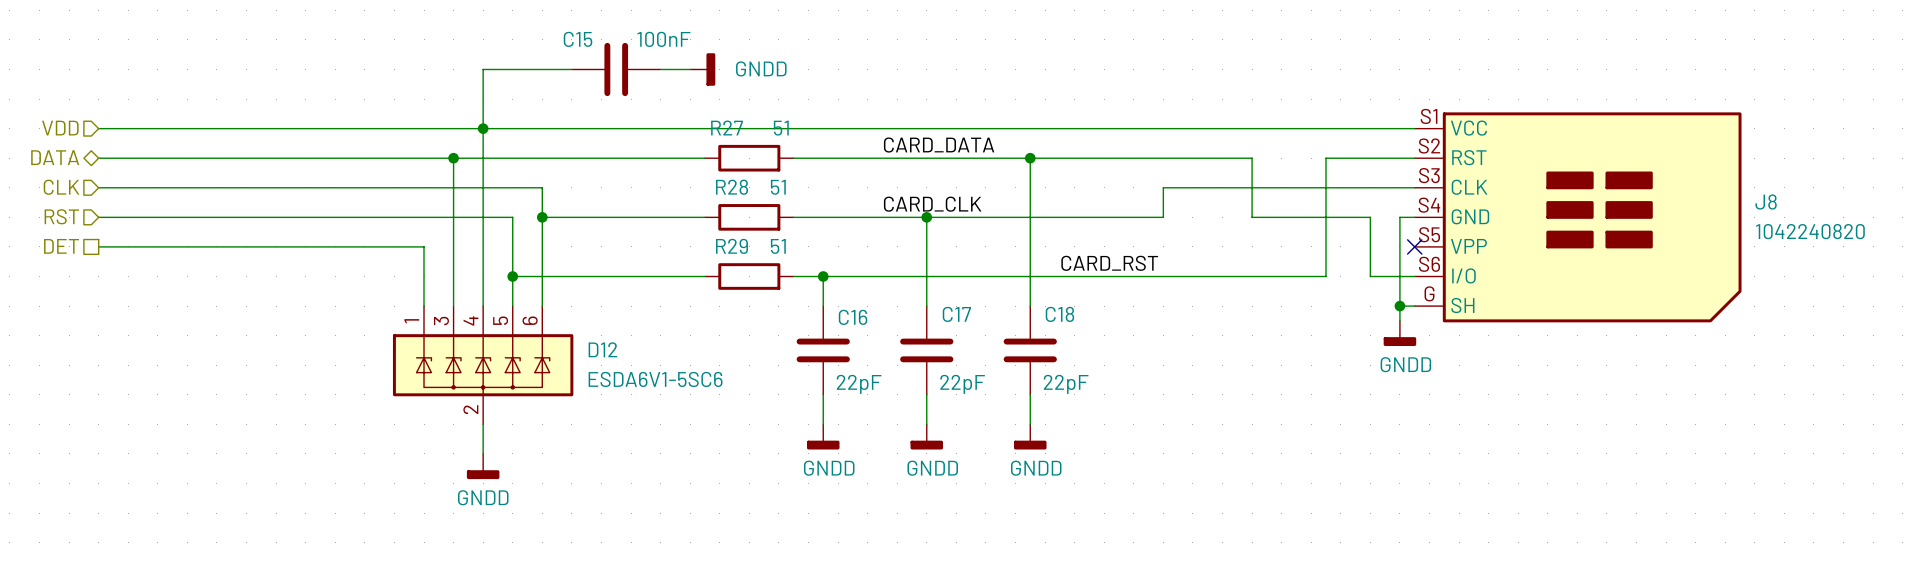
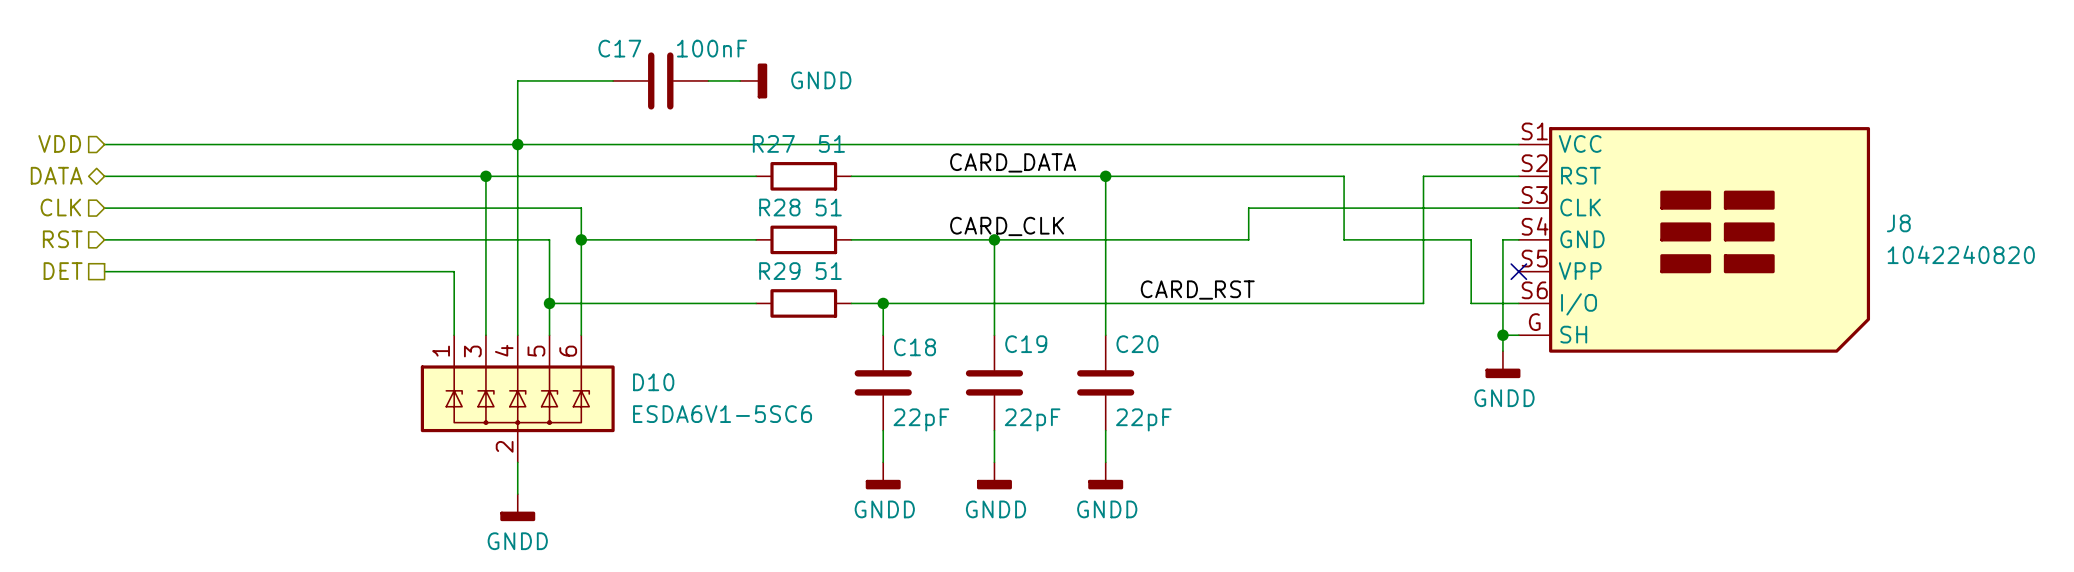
C15 name: C15 (578, 39) -> C17 (619, 48)
C17 name: C17 (956, 314) -> C19 (1026, 344)
C18 name: C18 (1059, 314) -> C20 (1137, 344)
C16 name: C16 (853, 317) -> C18 (915, 347)
D12 name: D12 (602, 349) -> D10 (653, 382)

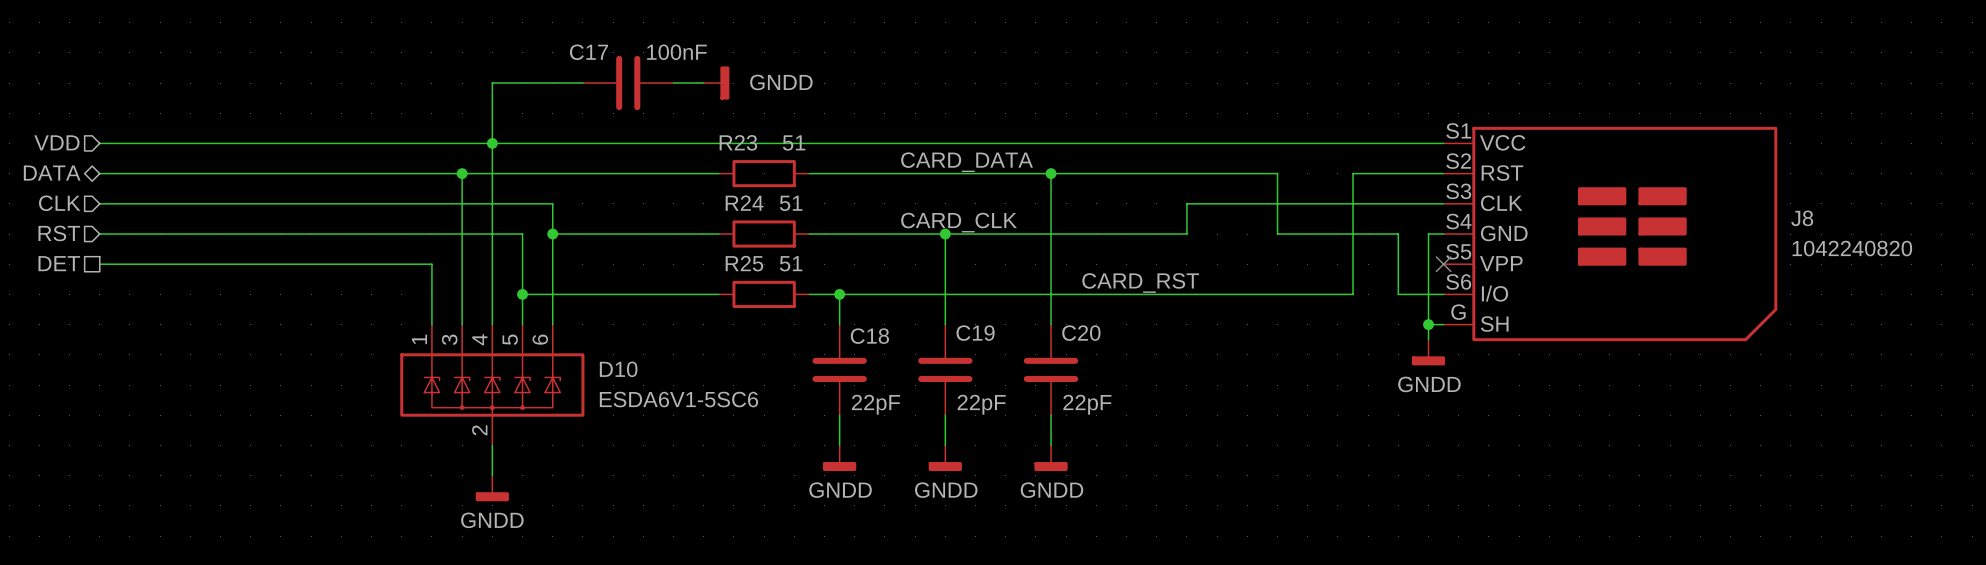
R27 name: R27 (773, 143) -> R23 (738, 142)
R28 name: R28 (779, 207) -> R24 (744, 203)
R29 name: R29 (779, 271) -> R25 (744, 263)

